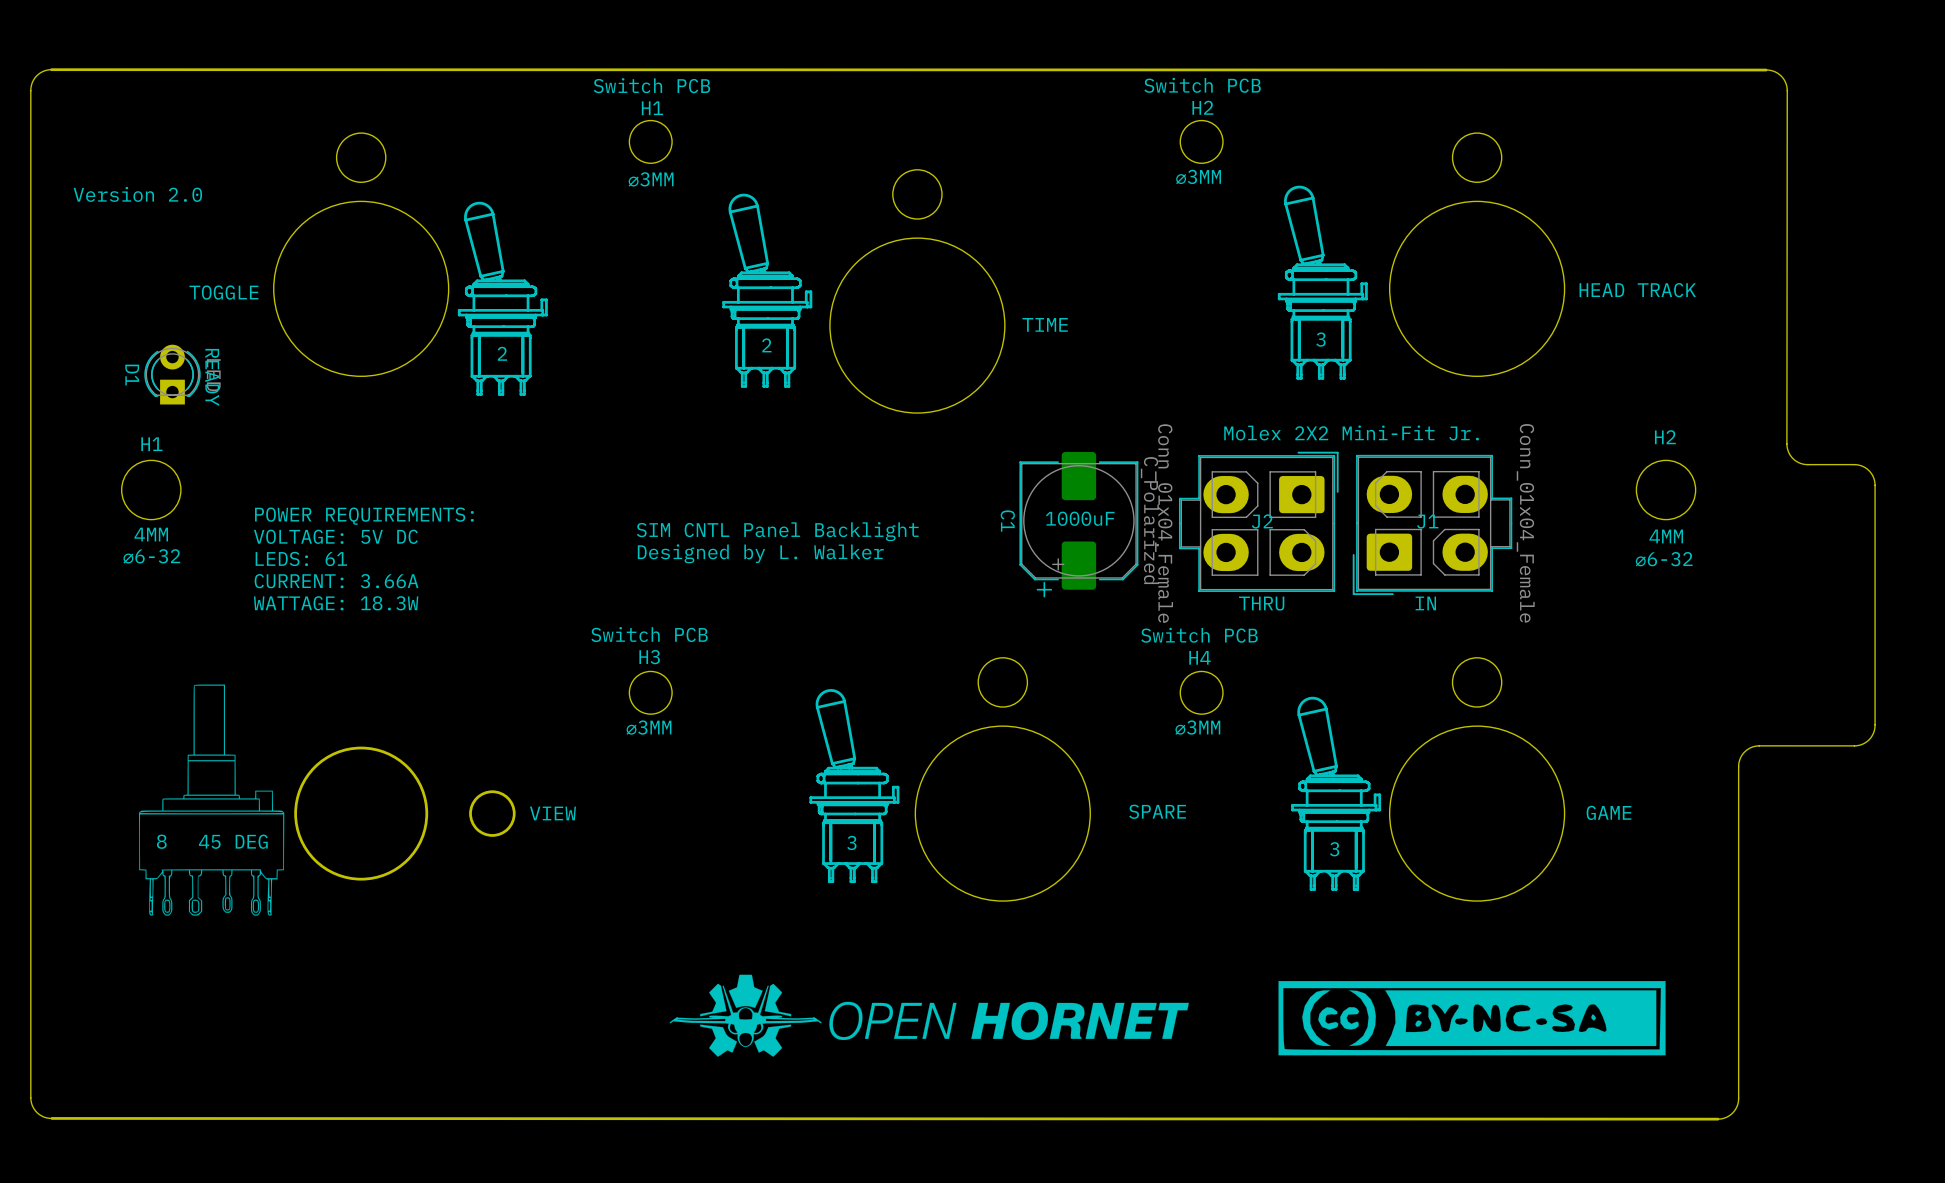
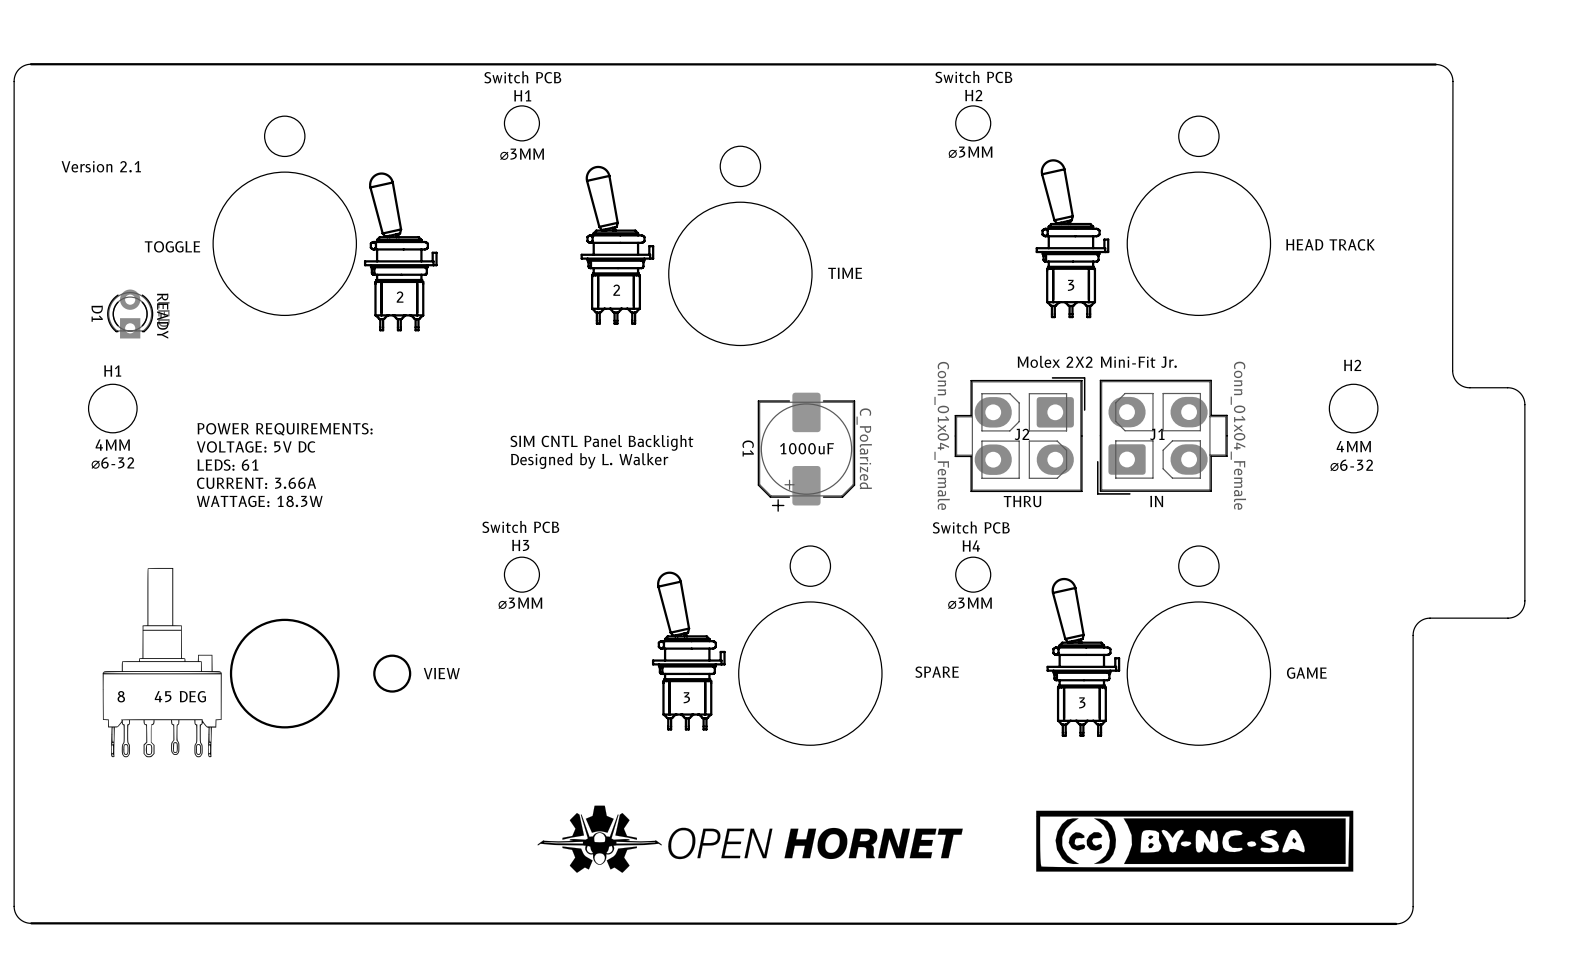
text: Version 2.0 (137, 194) -> Version 2.1 (101, 166)
text position: 1000uF (1080, 518) -> 1000uF (806, 448)
C1 position: (1078, 524) -> (806, 452)

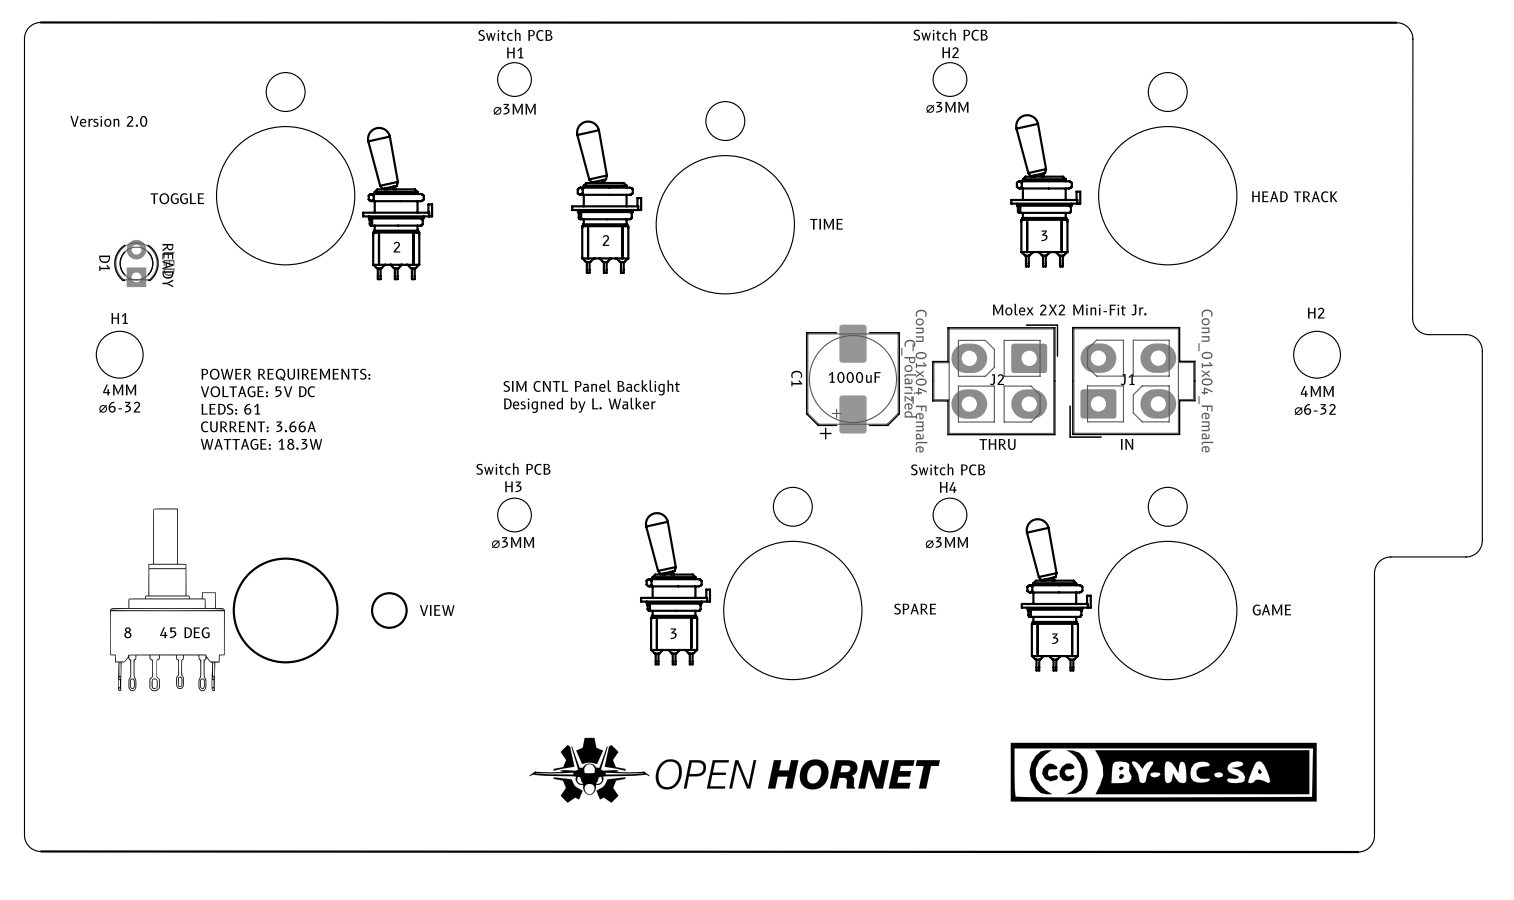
text: Version 2.1 (101, 166) -> Version 2.0 (108, 121)
text position: 1000uF (806, 448) -> 1000uF (854, 377)
C1 position: (806, 452) -> (852, 382)

